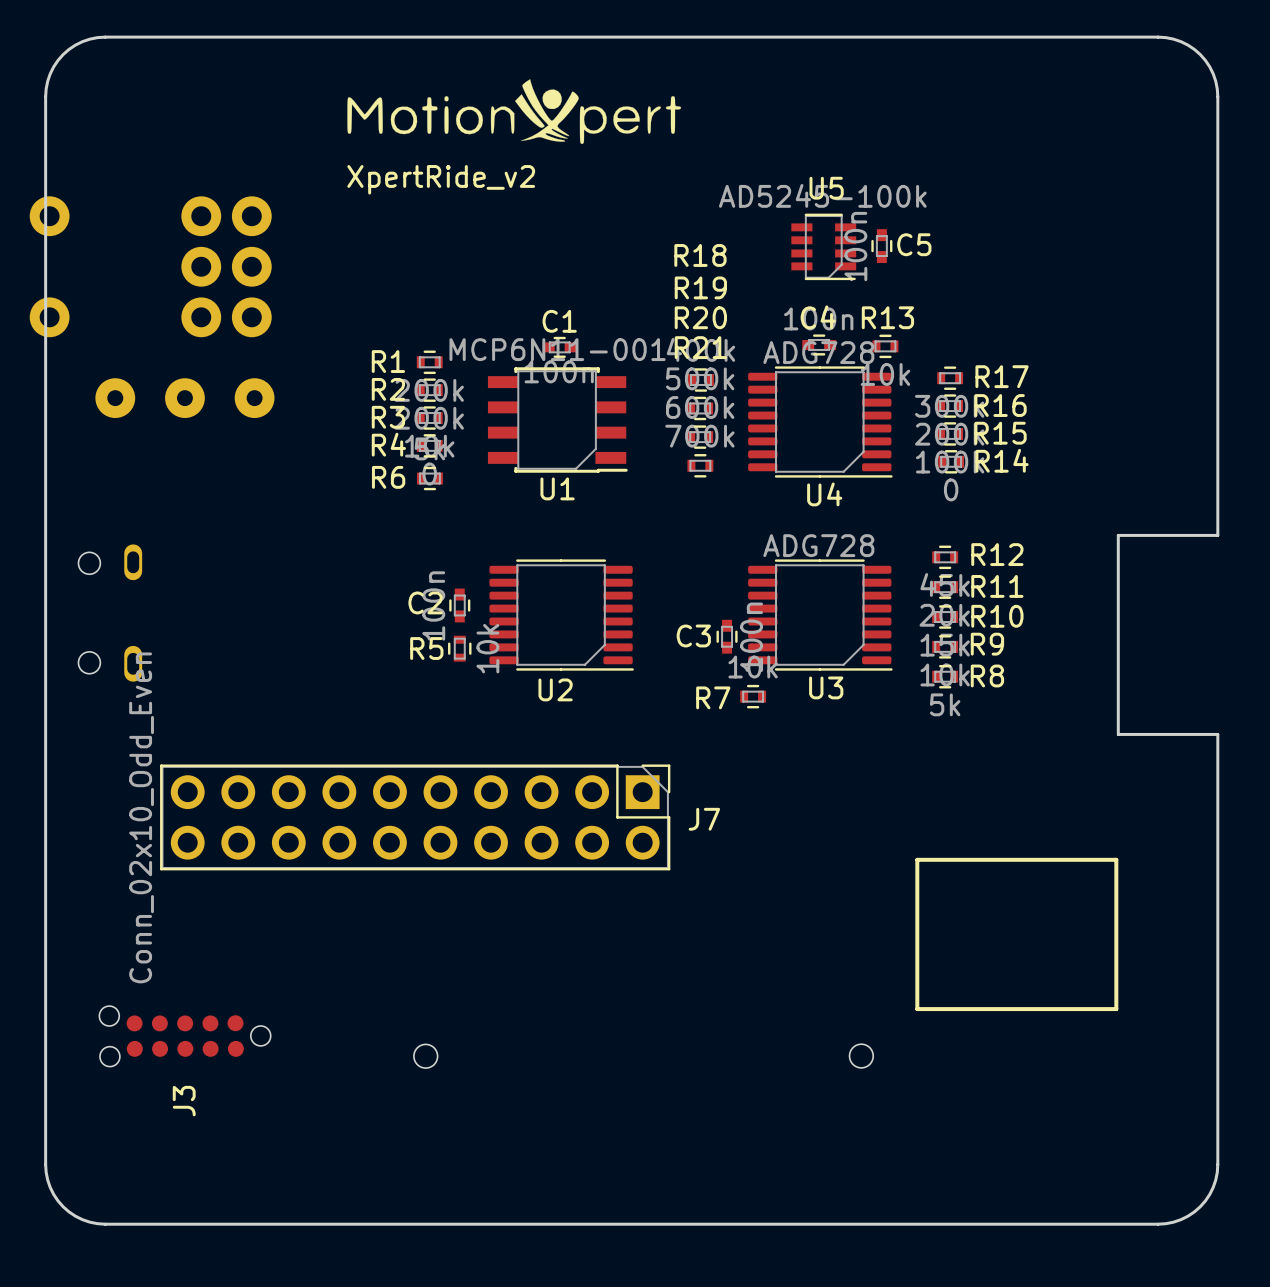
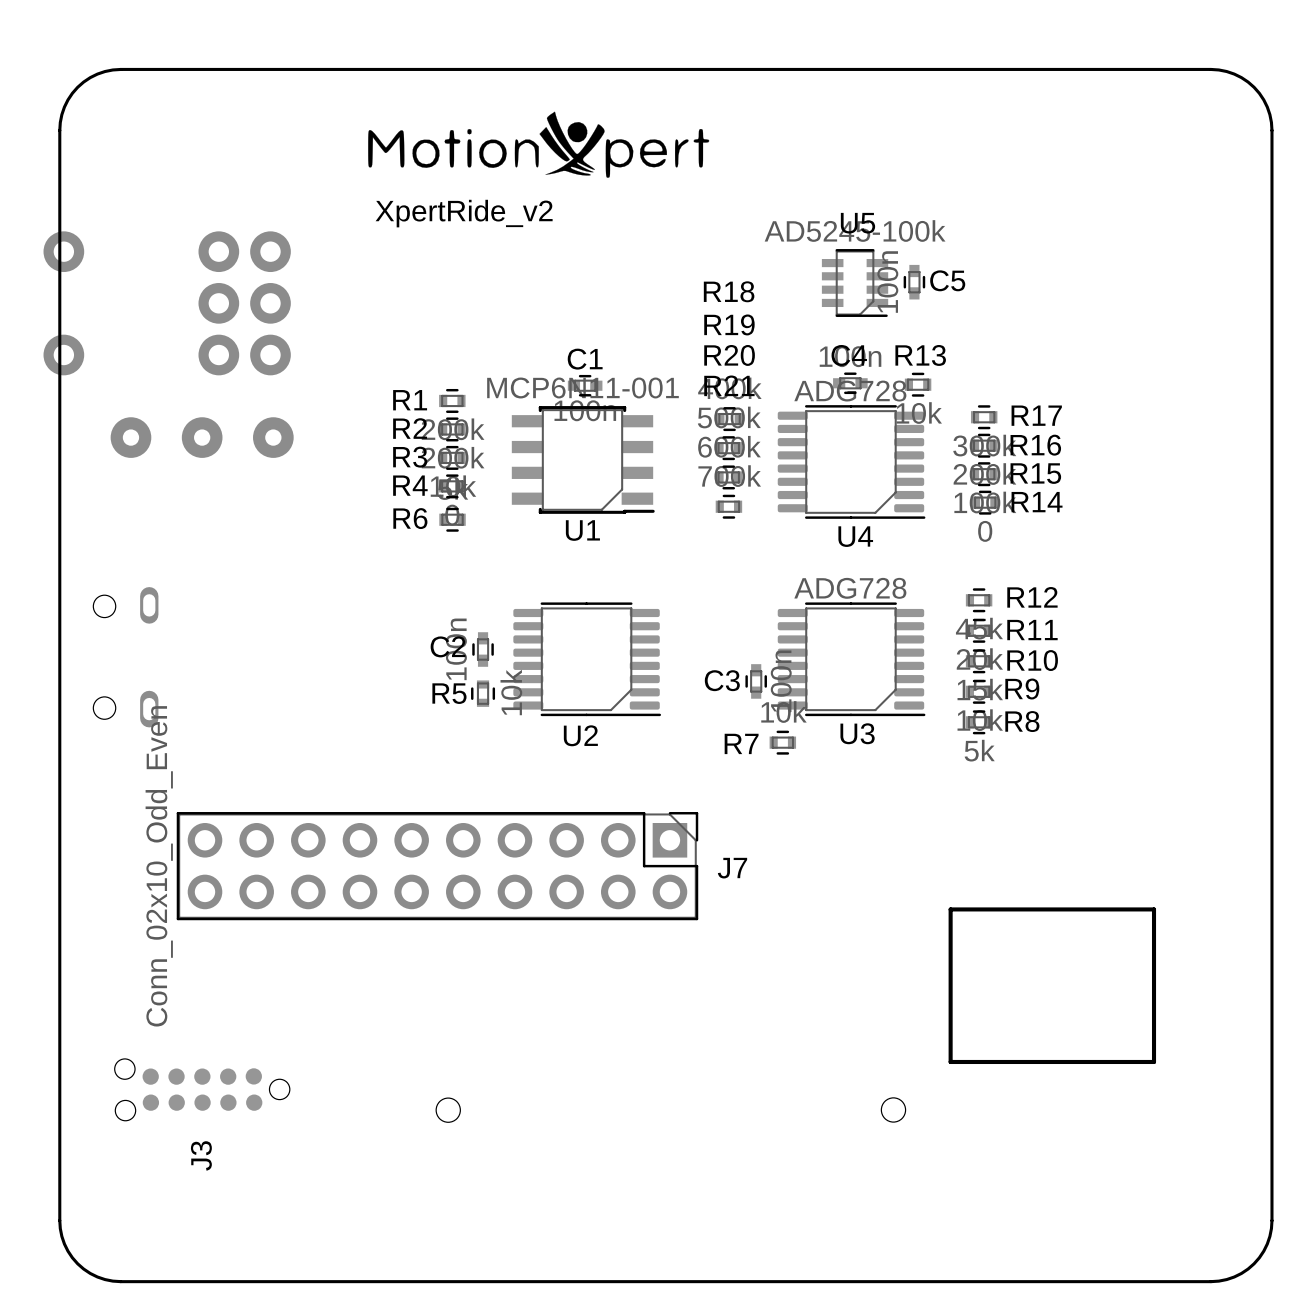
board edge: (45, 97) (50, 73) (63, 54) (82, 41) (105, 37) (1158, 37) (1180, 41) (1200, 54) (1213, 73) (1217, 96) (1217, 535) (1118, 535) (1118, 734) (1217, 734) (1217, 1164) (1213, 1187) (1200, 1206) (1180, 1219) (1158, 1224) (105, 1224) (82, 1219) (63, 1206) (50, 1187) (45, 1164) -> (59, 130) (64, 107) (77, 87) (97, 74) (120, 69) (1210, 69) (1234, 74) (1254, 87) (1267, 107) (1271, 130) (1271, 1220) (1267, 1243) (1254, 1263) (1234, 1276) (1210, 1281) (120, 1281) (97, 1276) (77, 1263) (64, 1243) (59, 1220)

